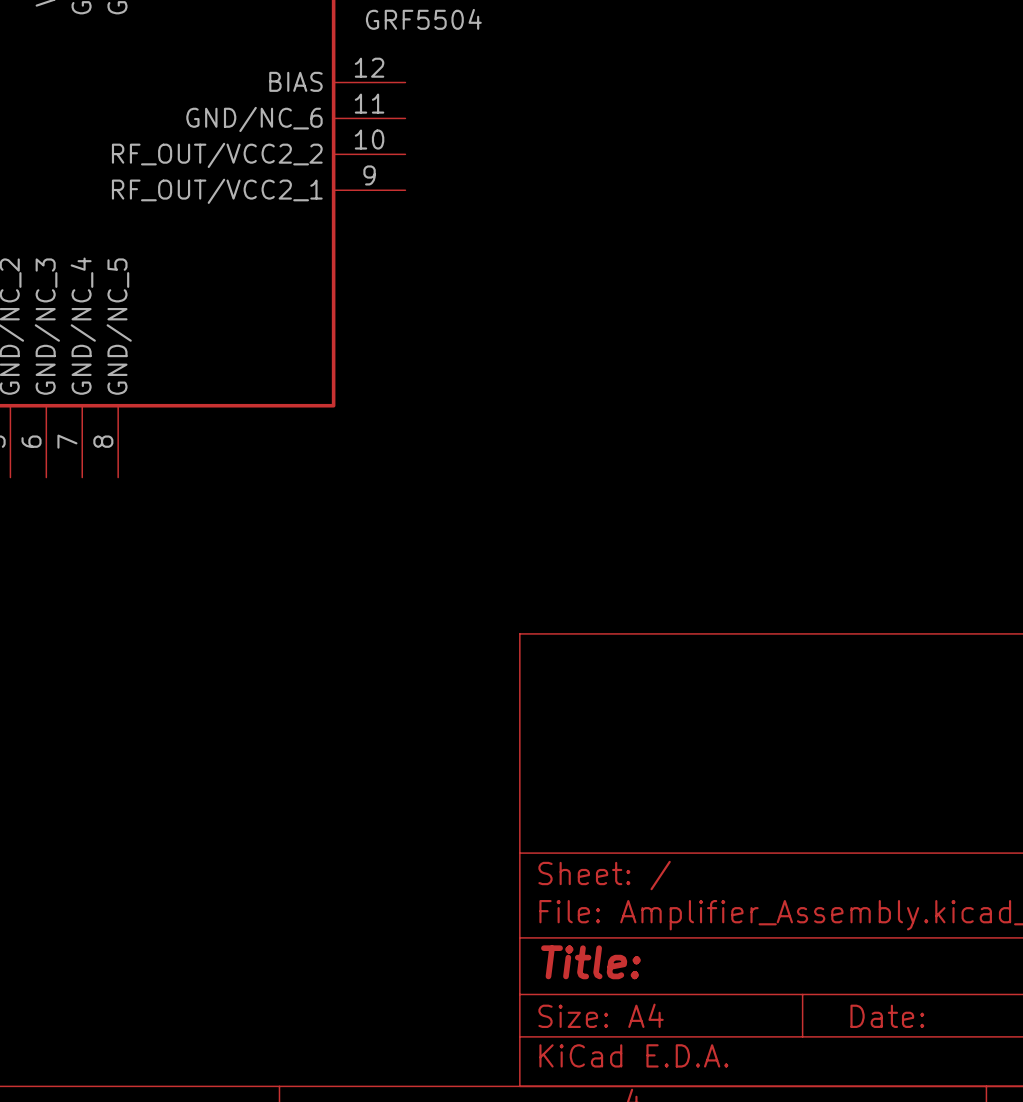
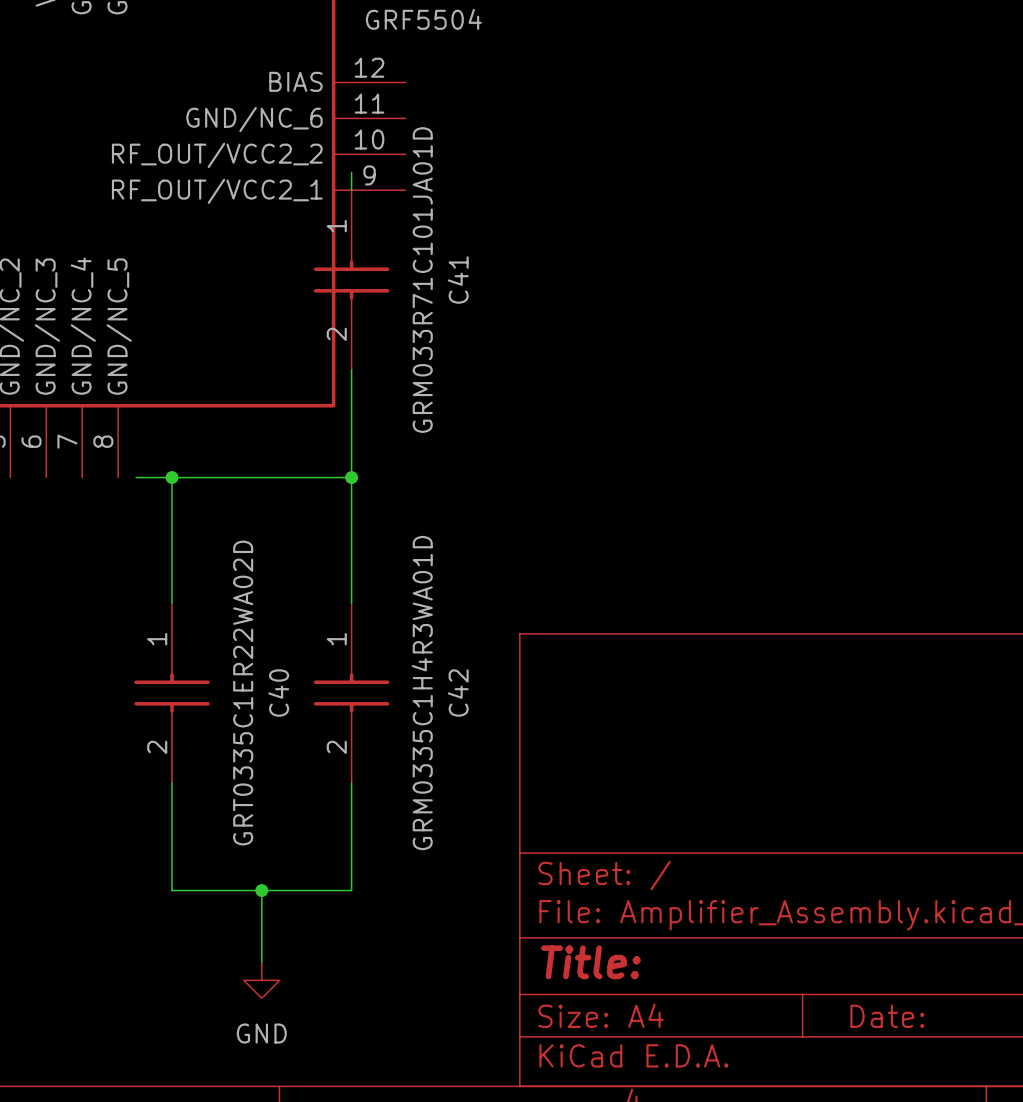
wire: none -> (351, 172) (351, 190)
C41: none -> GRM033R71C101JA01D (351, 280)
wire: none -> (351, 369) (351, 603)
wire: none -> (136, 477) (351, 477)
wire: none -> (172, 477) (172, 603)
junction: none -> (172, 477)
junction: none -> (351, 477)
C40: none -> GRT0335C1ER22WA02D (172, 693)
C42: none -> GRM0335C1H4R3WA01D (351, 693)
wire: none -> (172, 782) (172, 890) (351, 890) (351, 782)
wire: none -> (261, 890) (261, 962)
junction: none -> (261, 890)
power symbol: none -> GND (261, 980)

